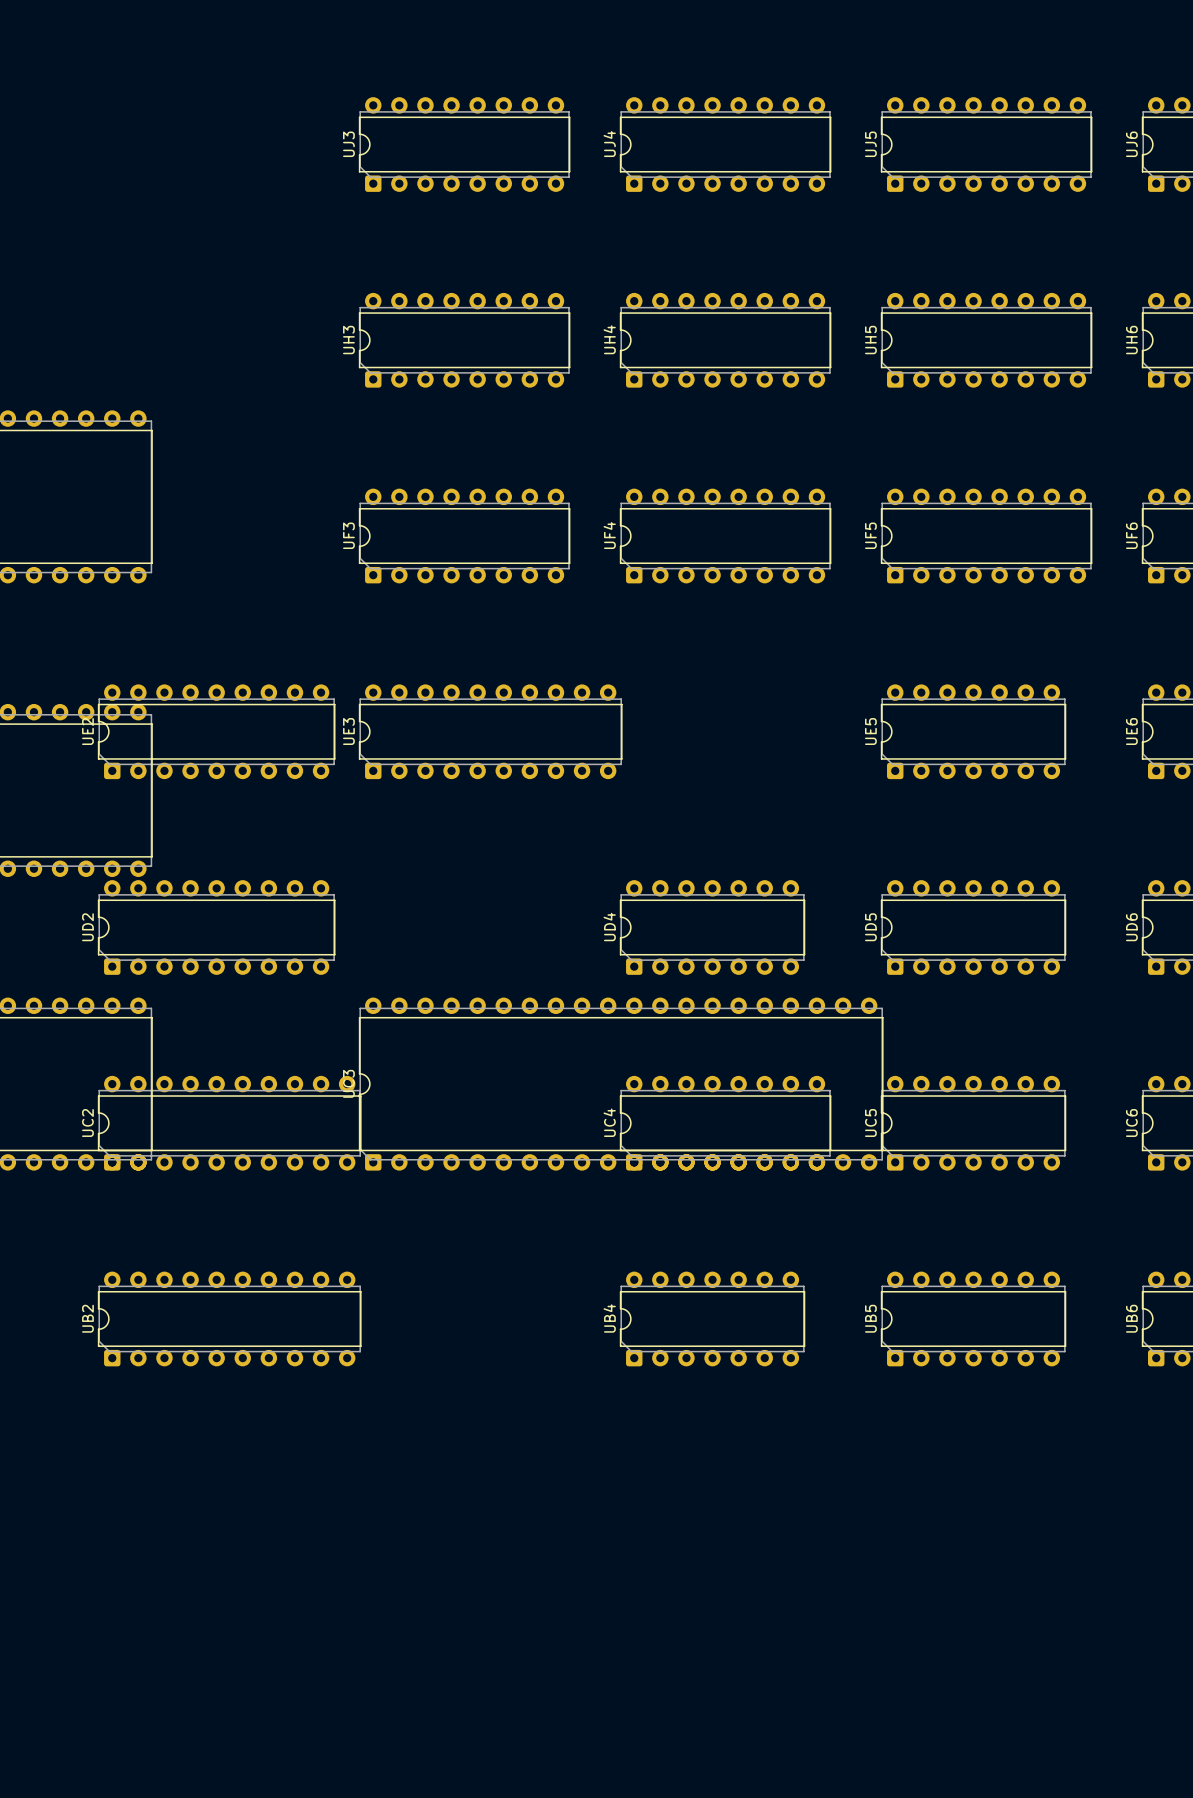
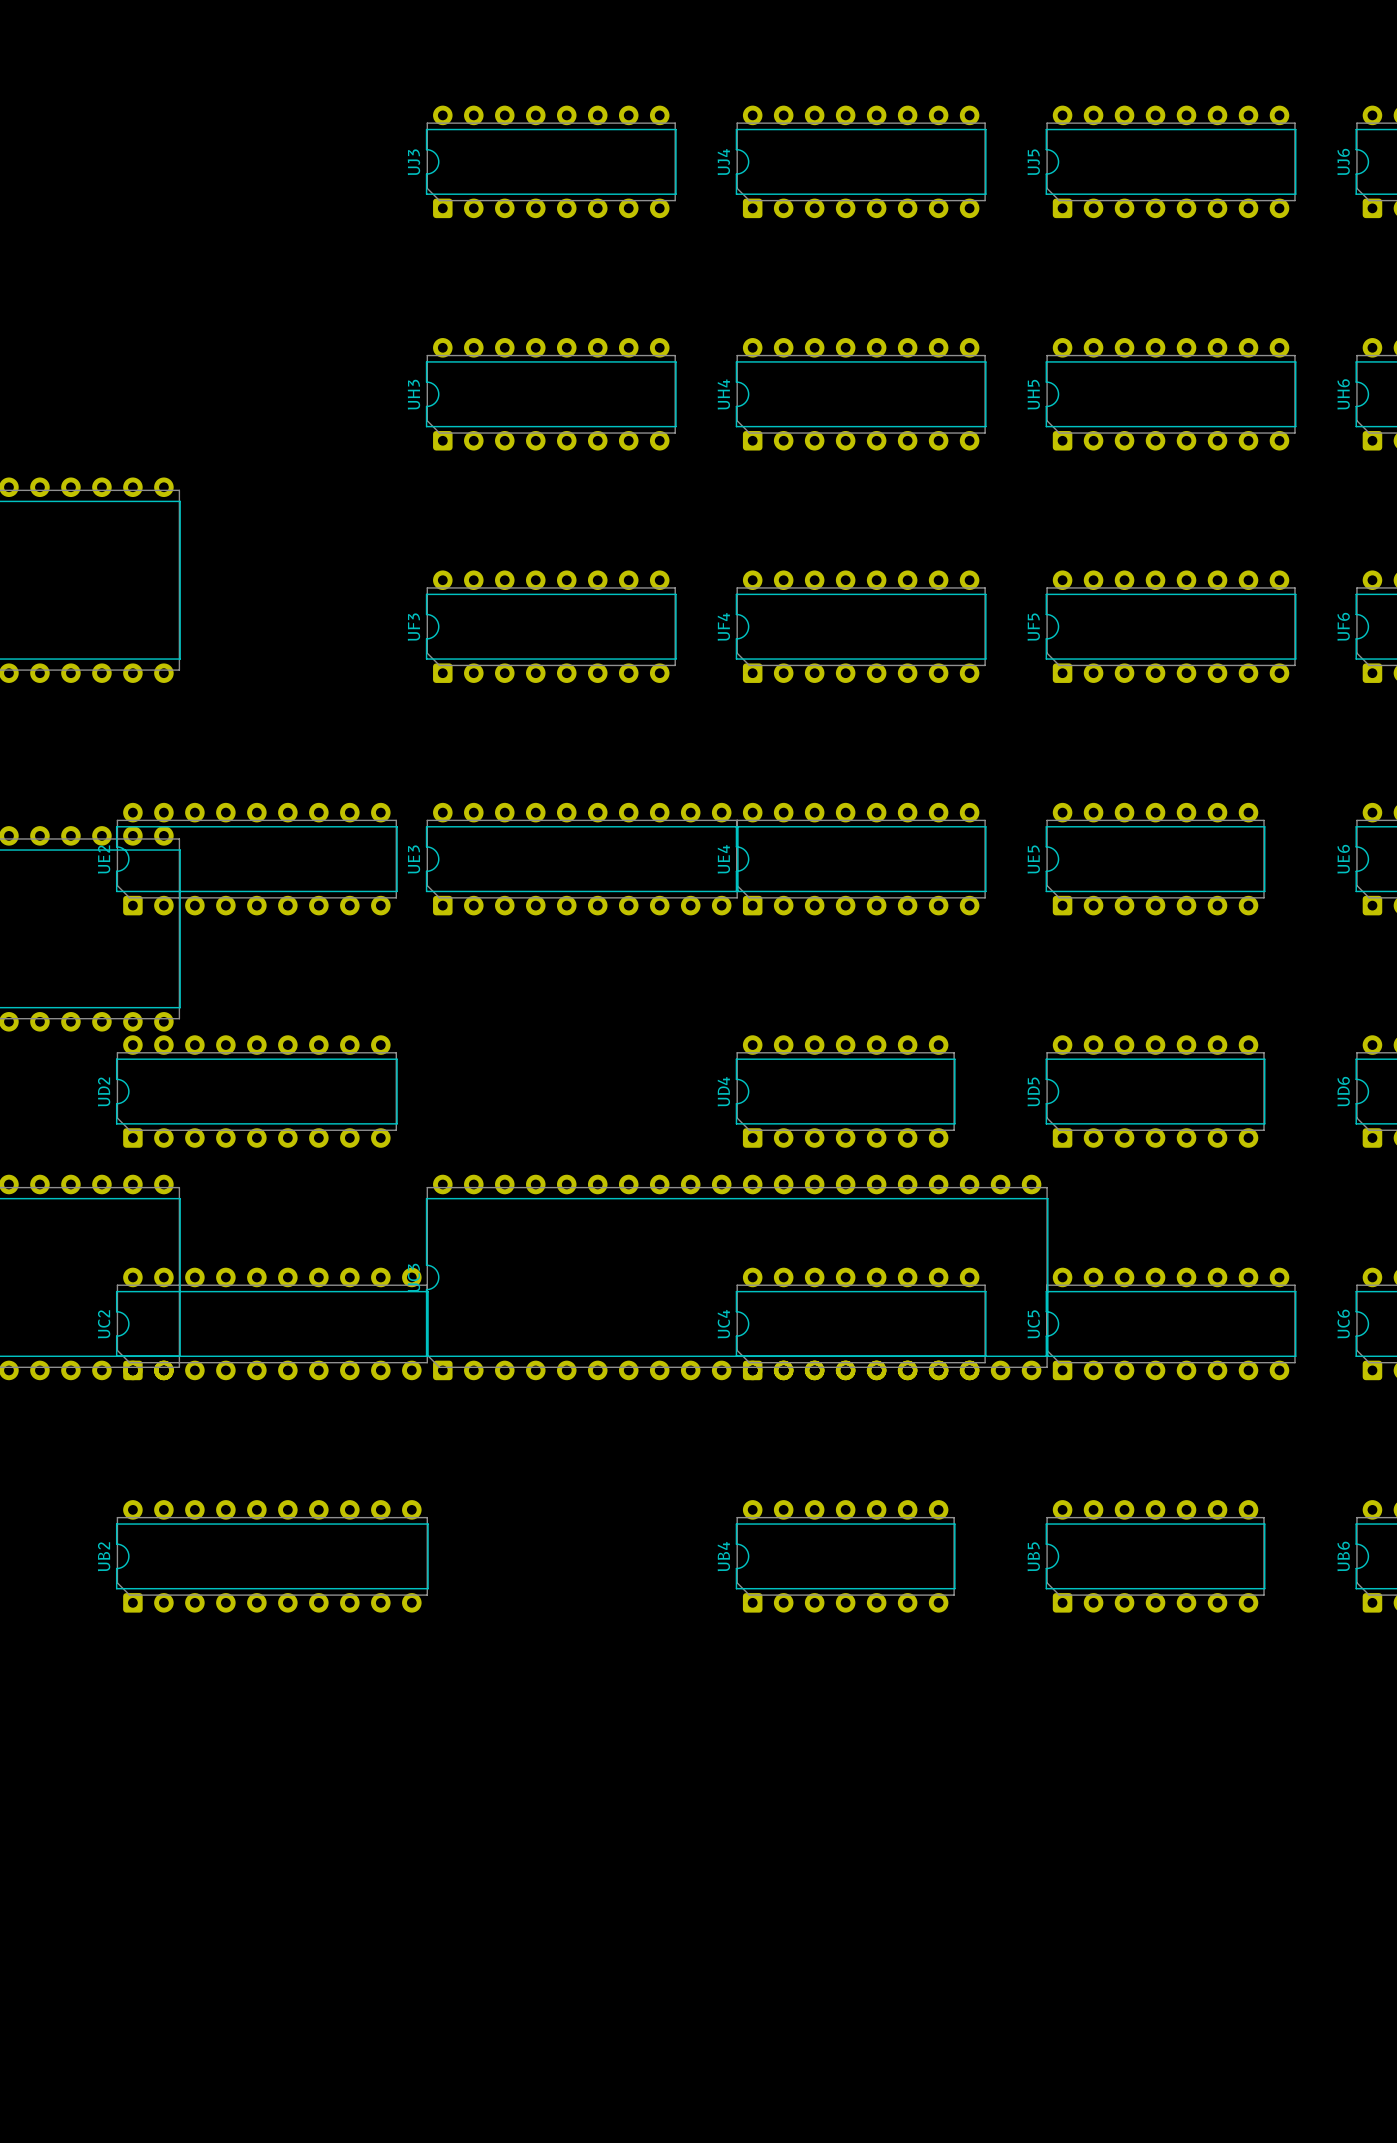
UE4: none -> (861, 859)
UC5 footprint: [880, 1075, 1067, 1171] -> [1045, 1267, 1297, 1381]

